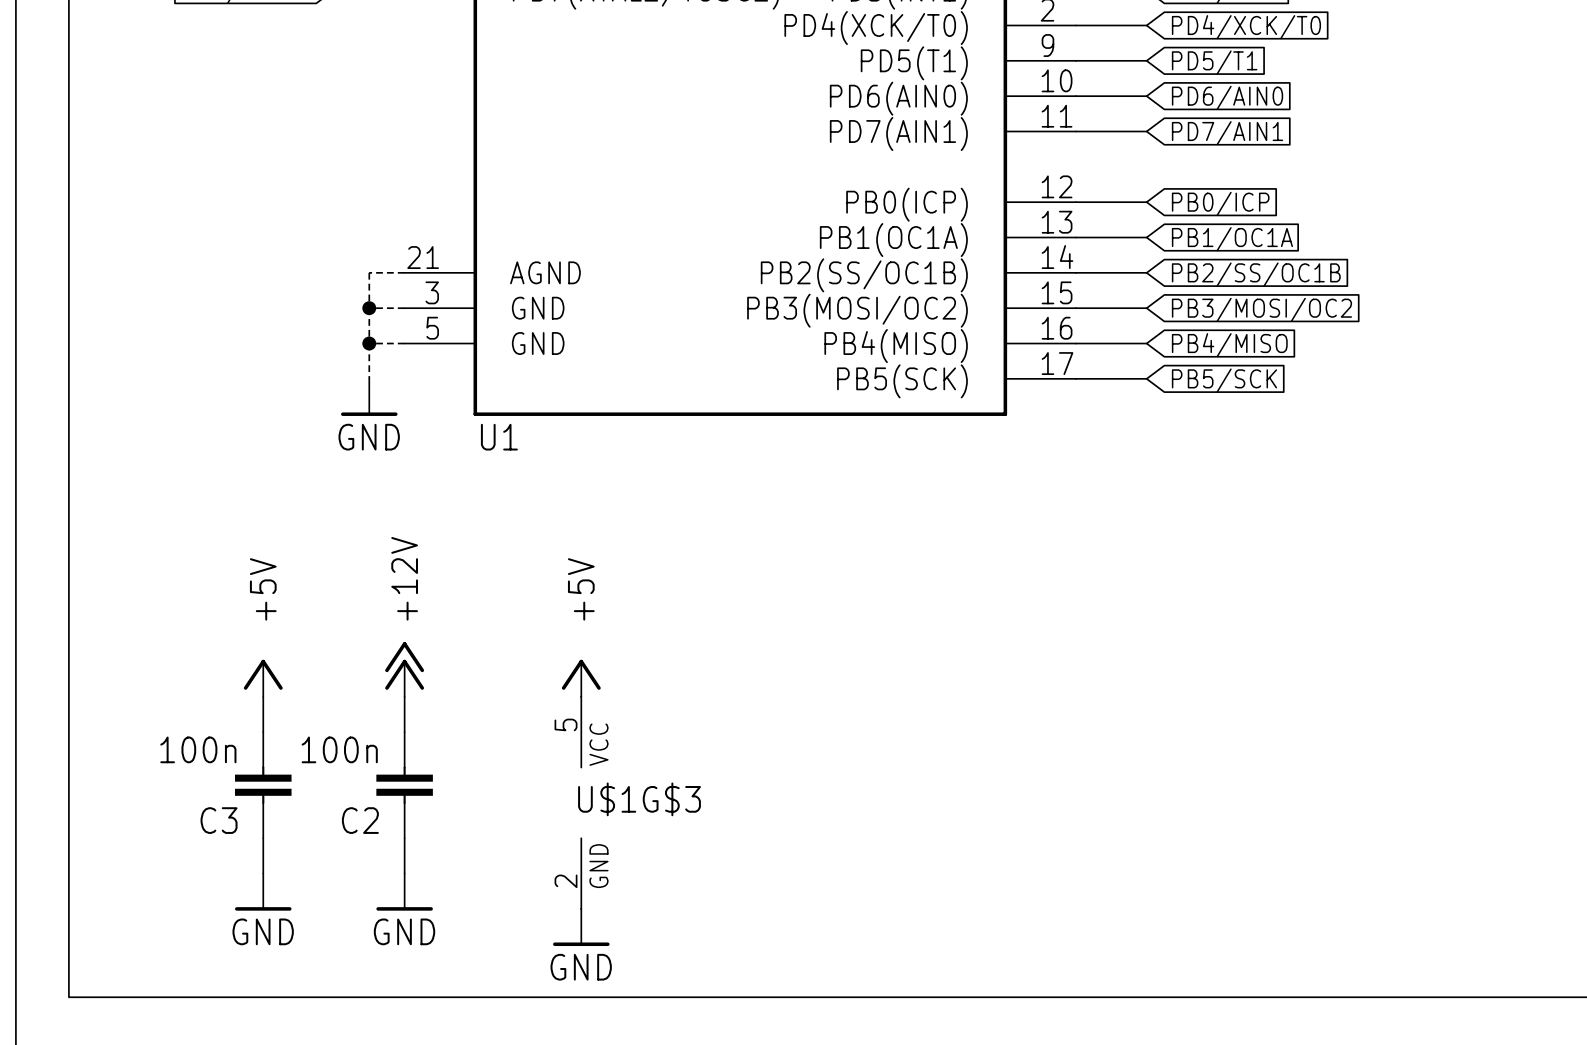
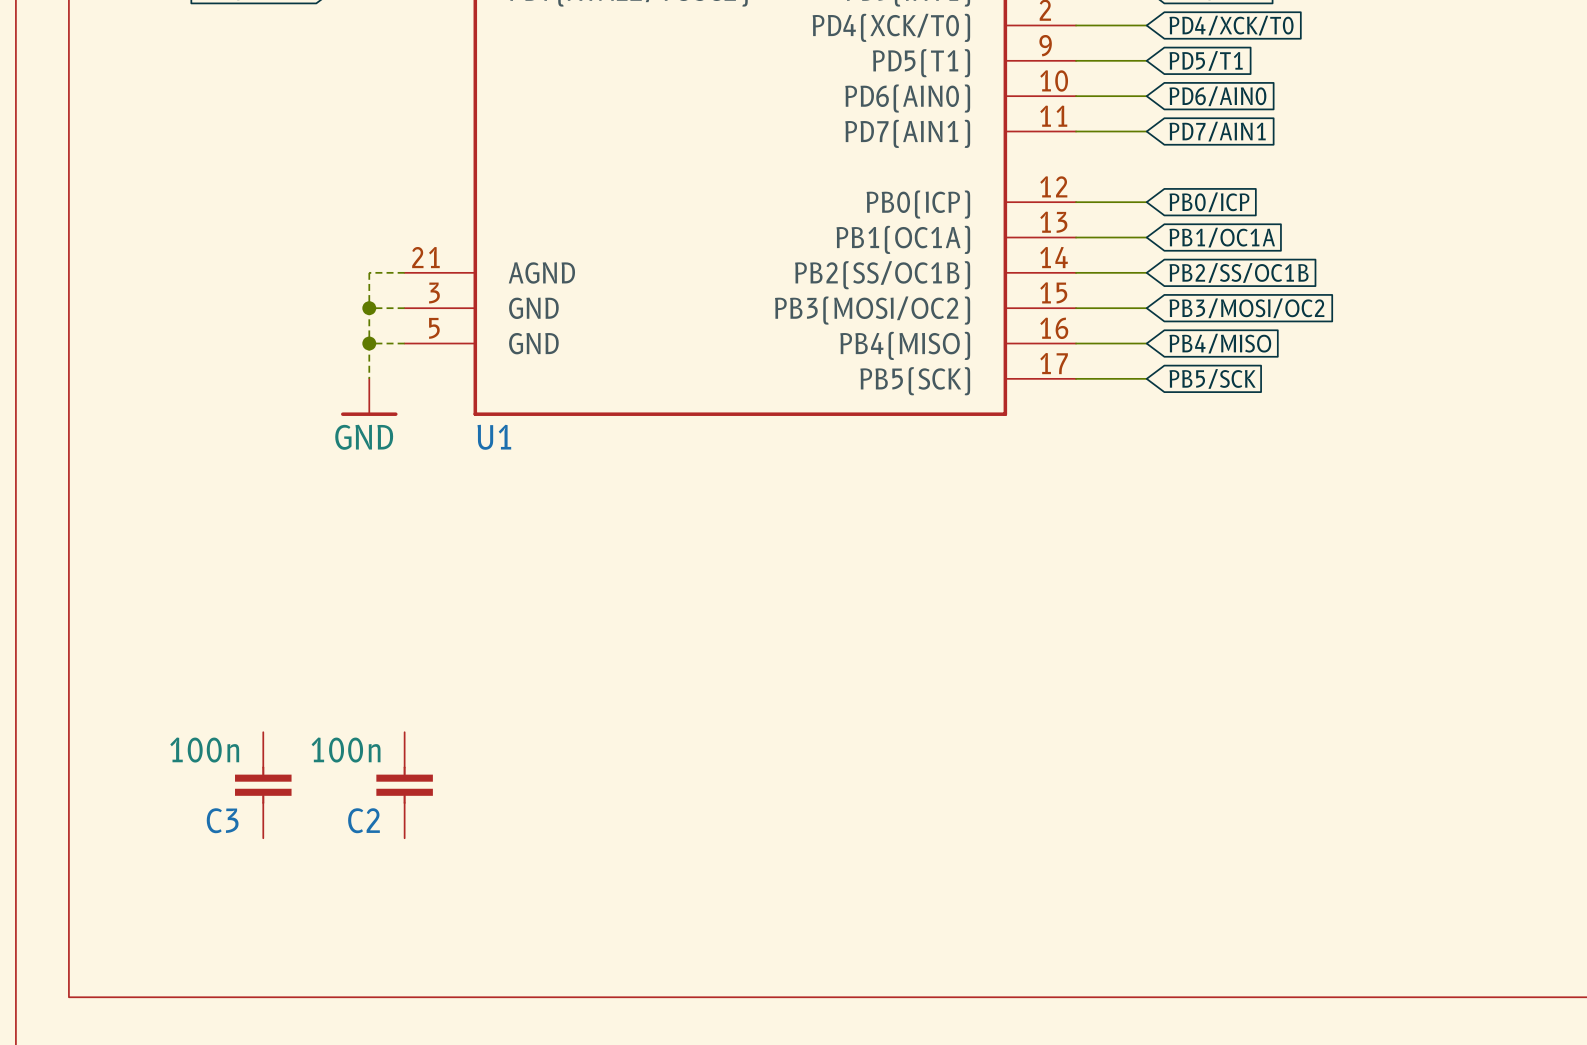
power symbol: +12V (404, 669) -> none
power symbol: +5V (263, 678) -> none
power symbol: +5V (581, 678) -> none
wire: (263, 696) (263, 732) -> none
wire: (404, 696) (404, 732) -> none
U$1G$3: (581, 802) -> none
wire: (263, 838) (263, 873) -> none
wire: (404, 838) (404, 873) -> none
power symbol: GND (263, 892) -> none
power symbol: GND (404, 892) -> none
power symbol: GND (581, 927) -> none

